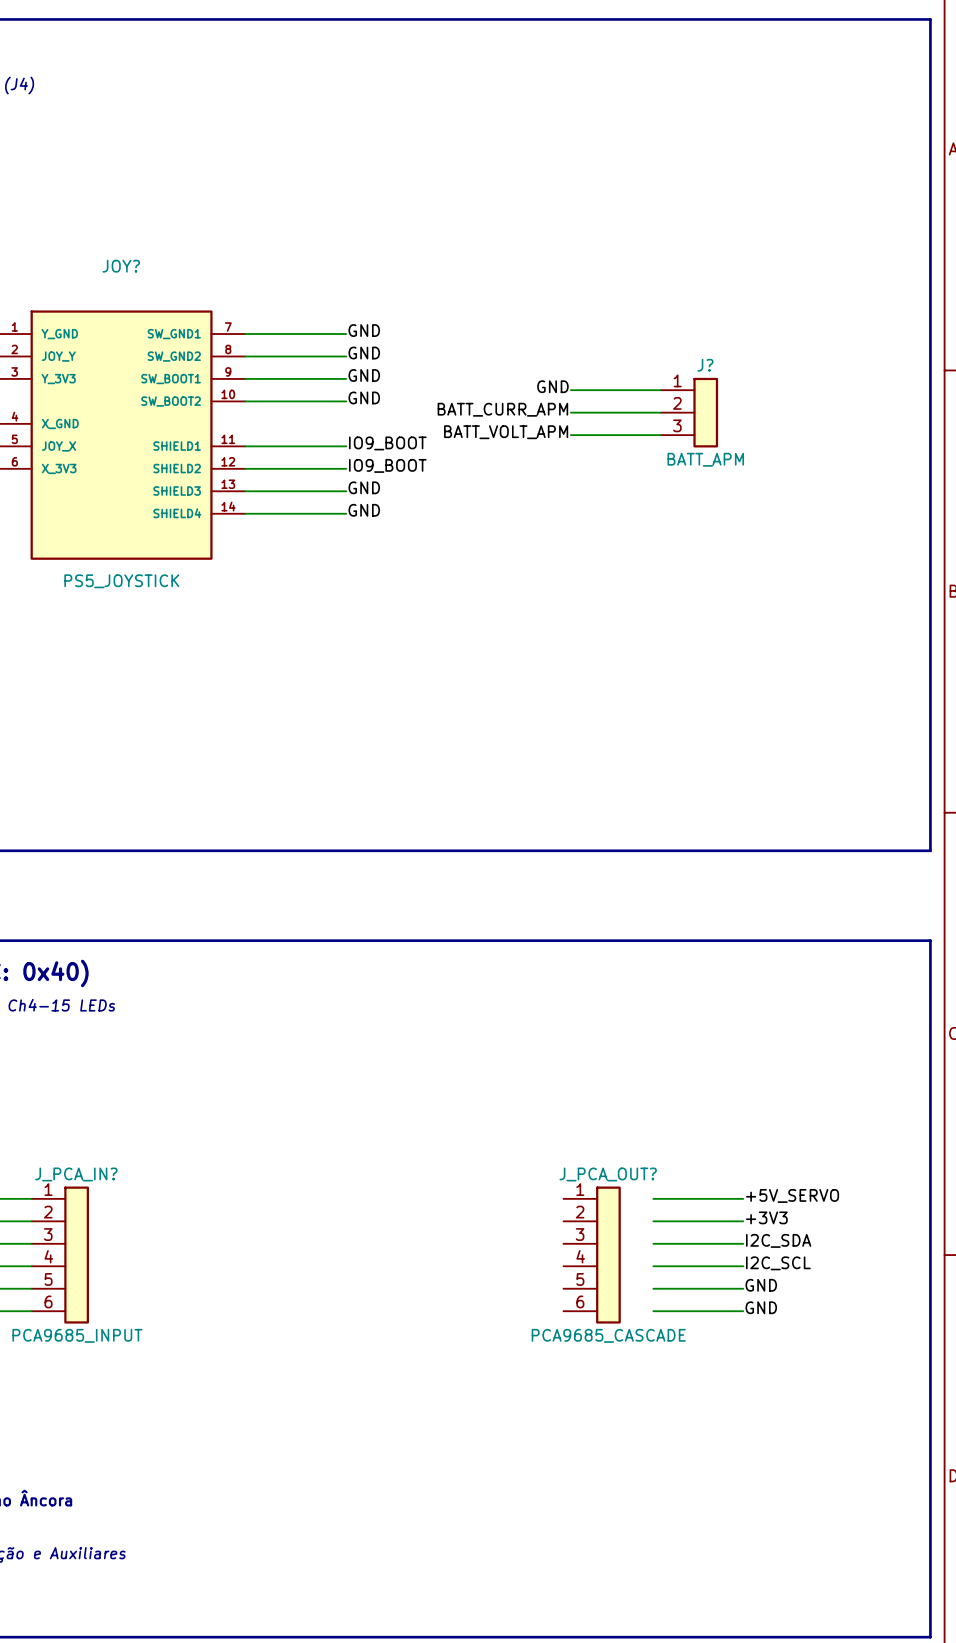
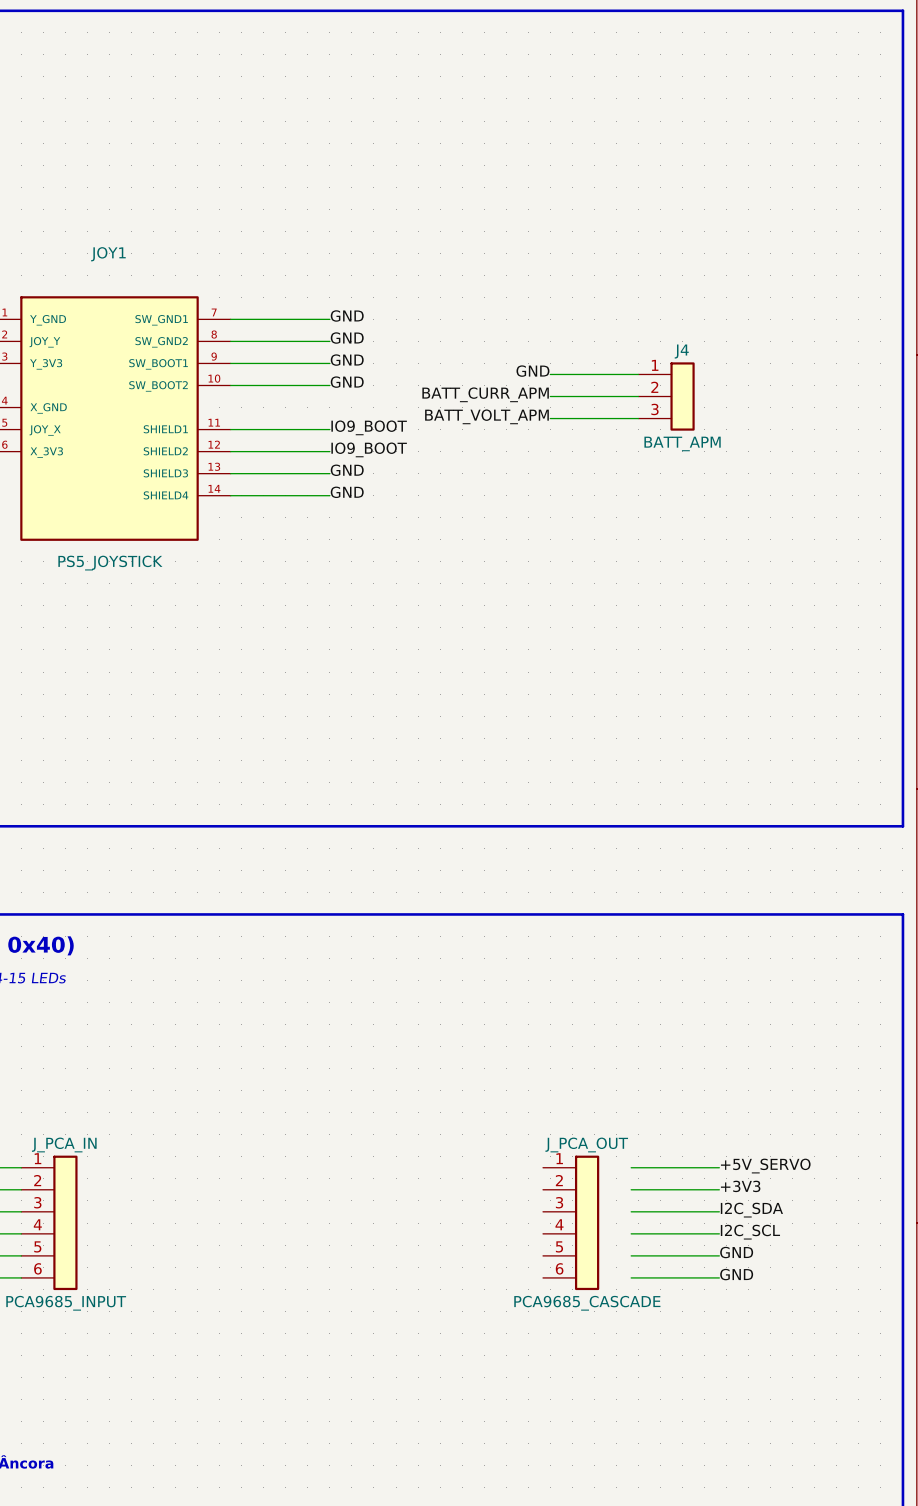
JOY? name: JOY? (121, 266) -> JOY1 (108, 254)
J? name: J? (705, 365) -> J4 (681, 351)
J_PCA_IN? name: J_PCA_IN? (76, 1174) -> J_PCA_IN (64, 1144)
J_PCA_OUT? name: J_PCA_OUT? (608, 1174) -> J_PCA_OUT (586, 1144)

